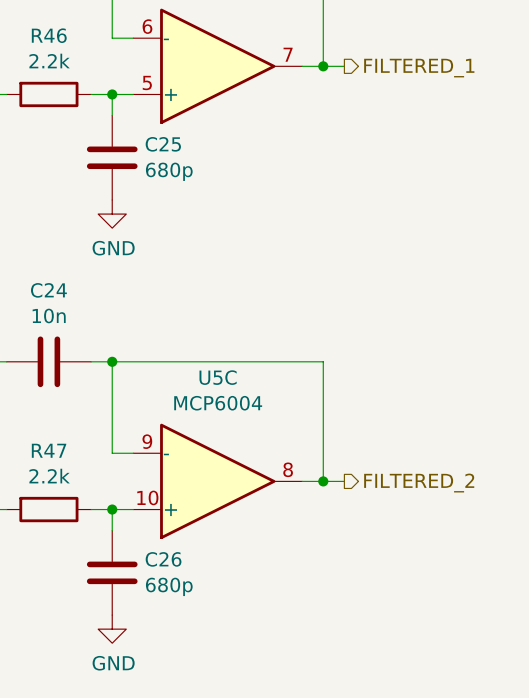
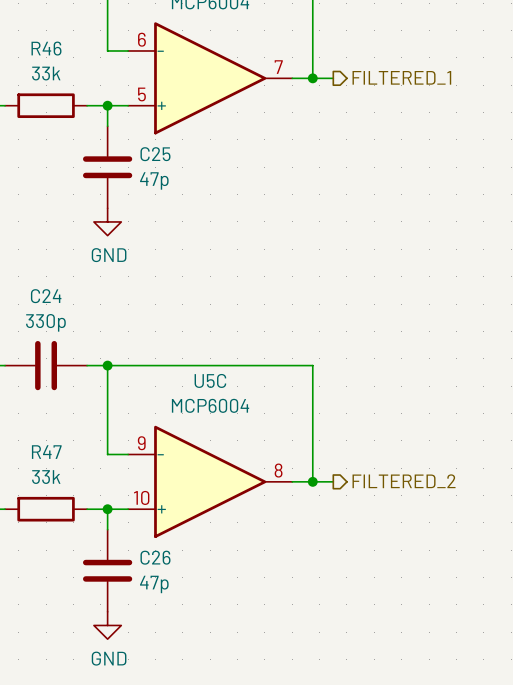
R46 value: 2.2k (49, 61) -> 33k (46, 73)
C25 value: 680p (169, 171) -> 47p (154, 180)
C24 value: 10n (49, 315) -> 330p (45, 322)
R47 value: 2.2k (49, 476) -> 33k (46, 477)
C26 value: 680p (169, 586) -> 47p (154, 584)

